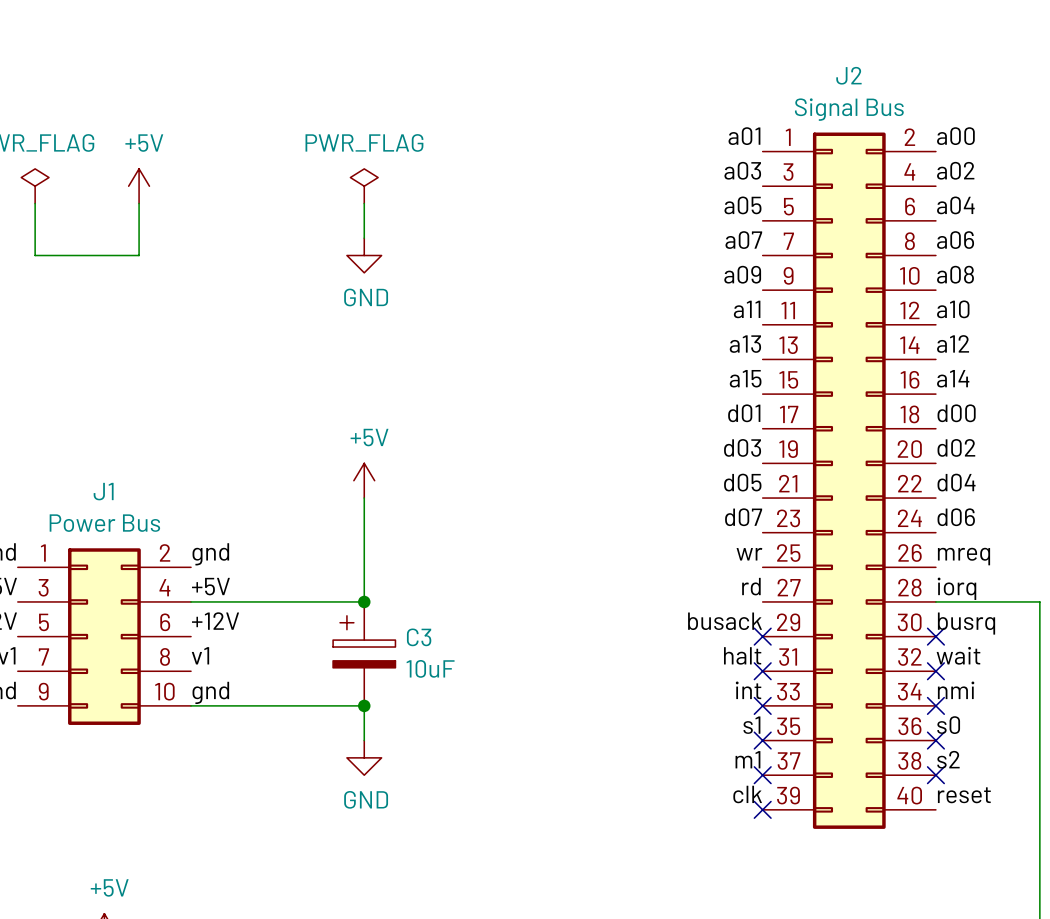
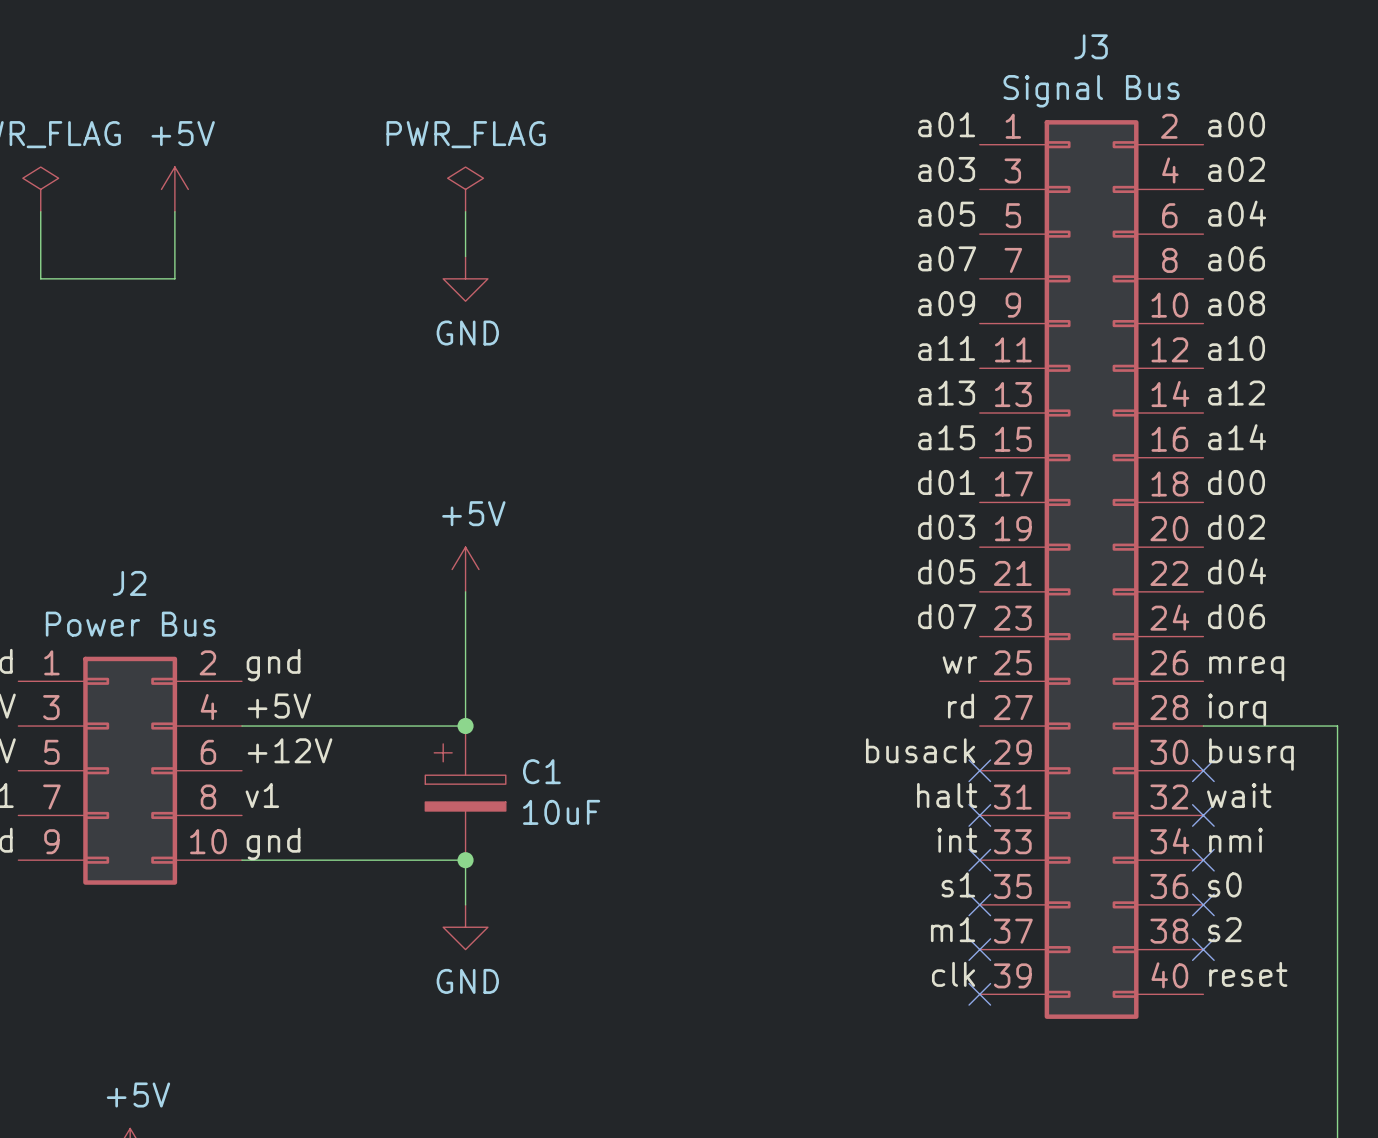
J2 name: J2 (848, 75) -> J3 (1091, 46)
J1 name: J1 (103, 491) -> J2 (129, 583)
C3 name: C3 (419, 637) -> C1 (541, 771)

